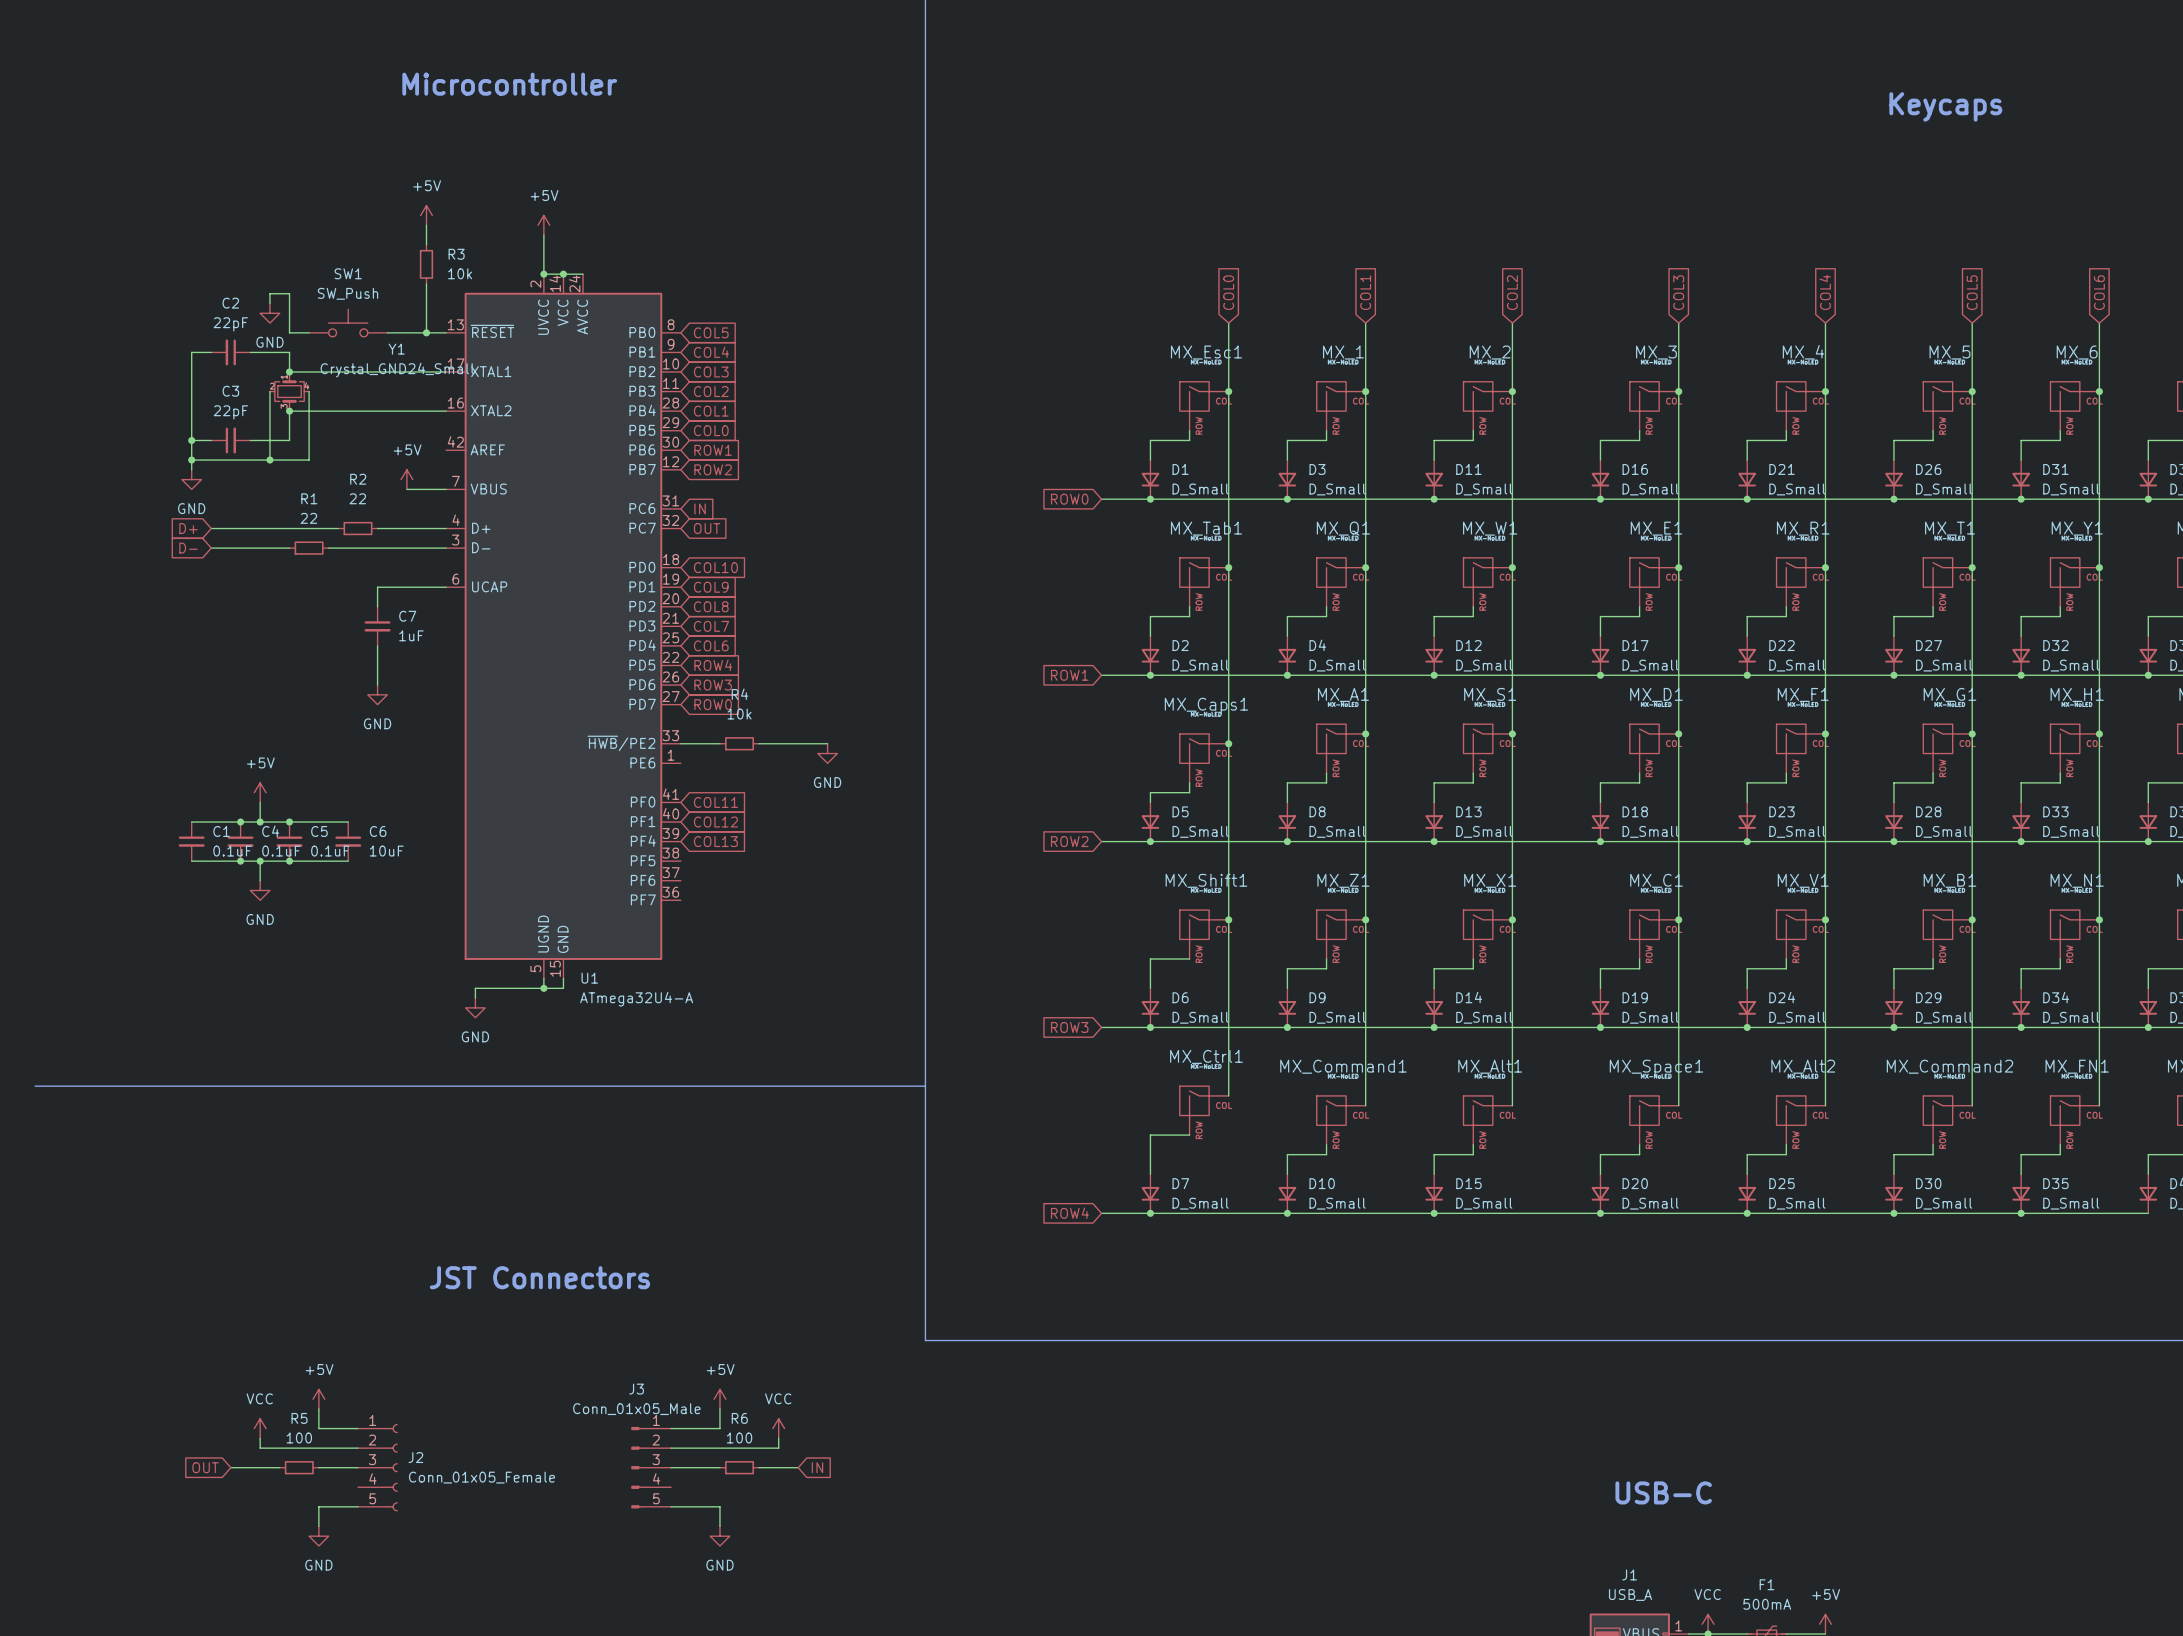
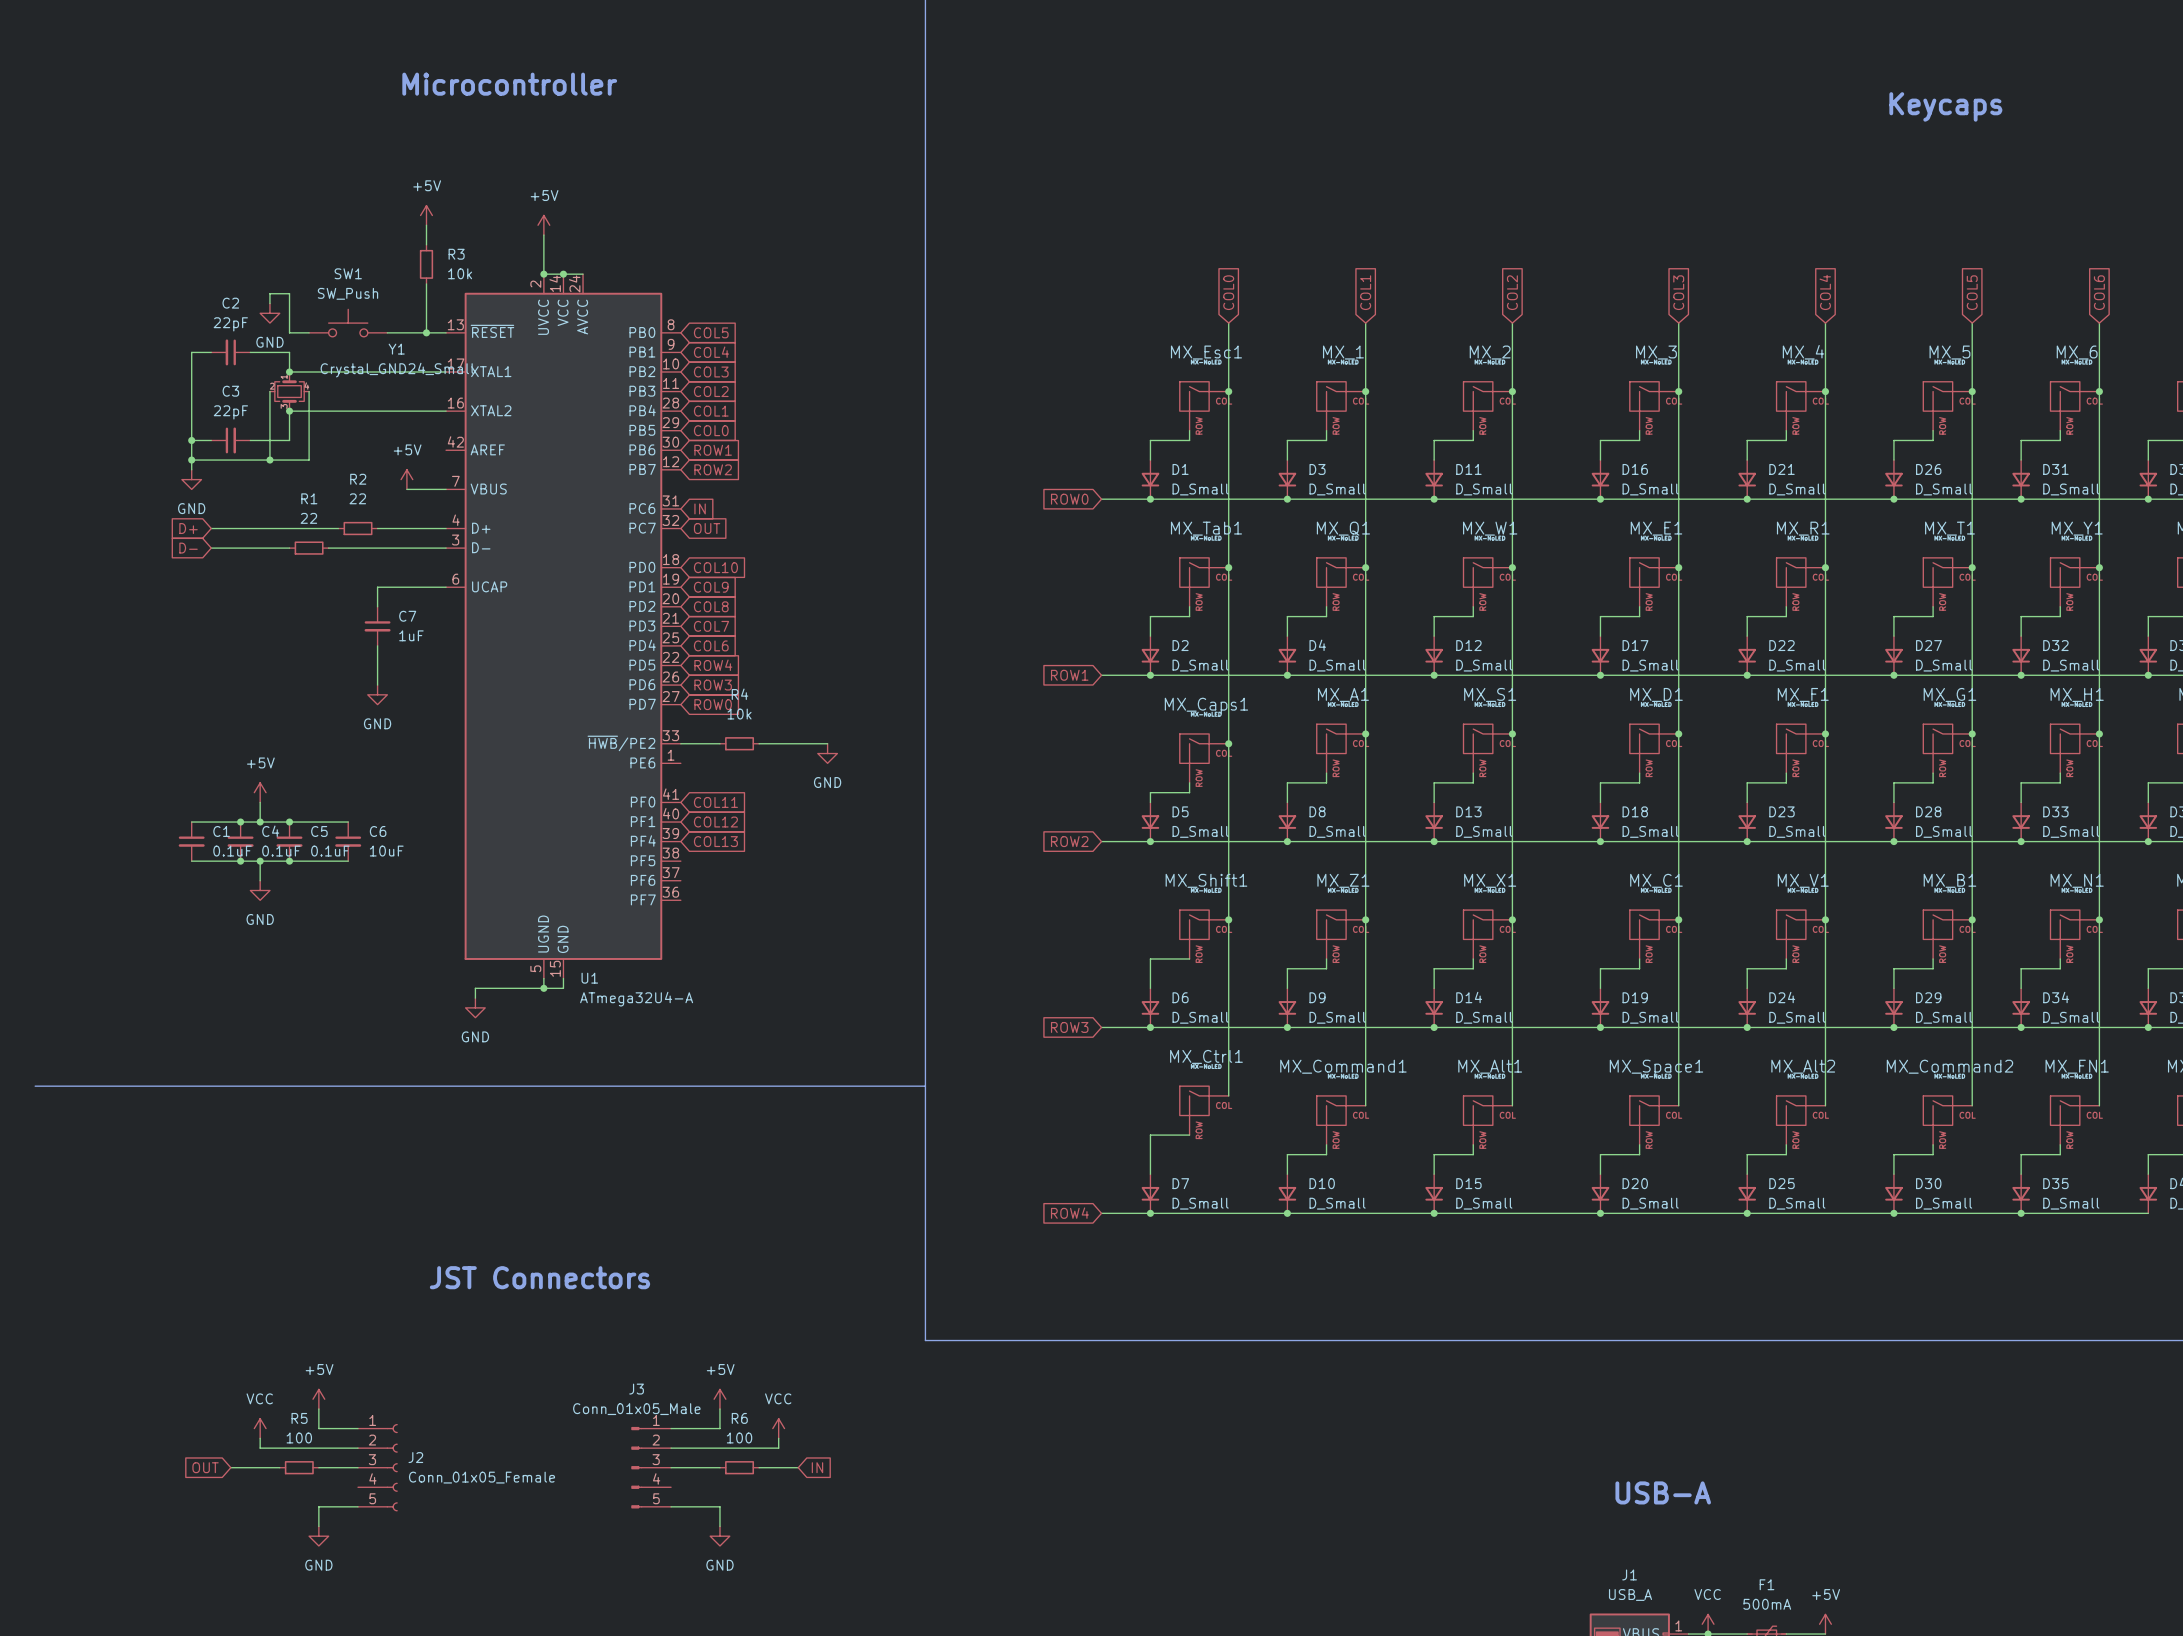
text: USB-C (1663, 1492) -> USB-A (1663, 1492)

